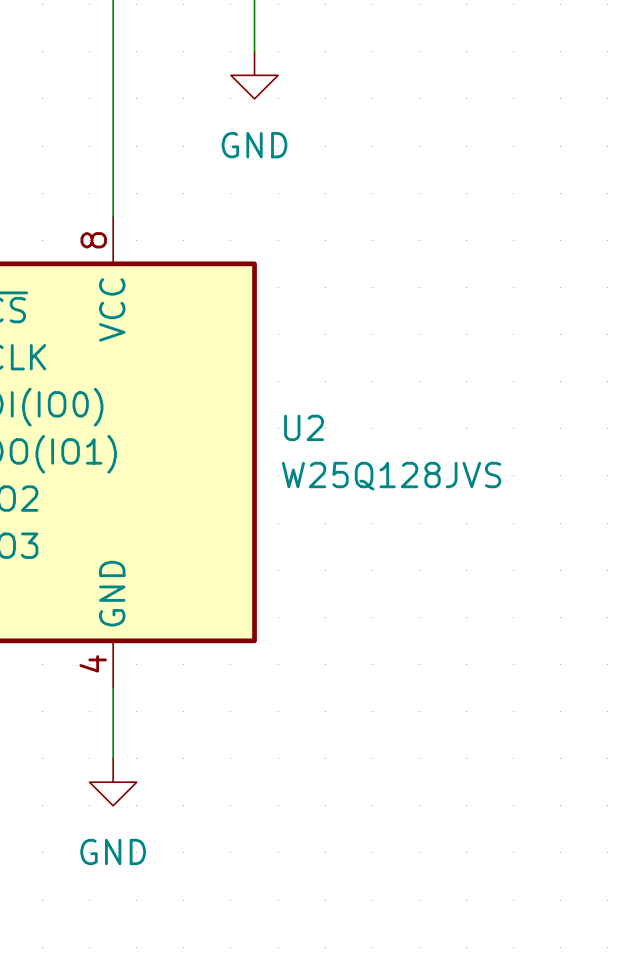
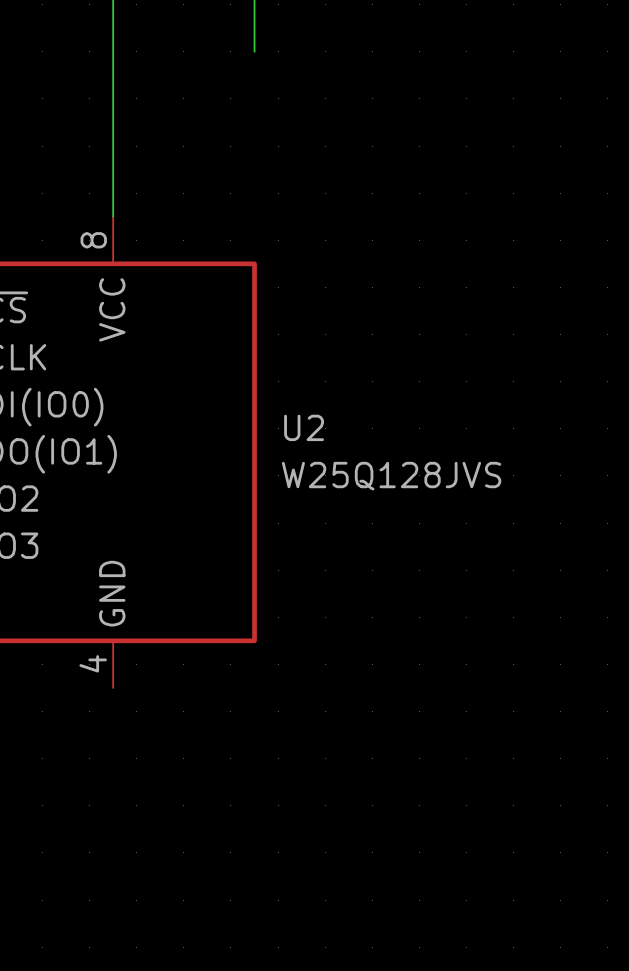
power symbol: GND (254, 75) -> none
wire: (113, 687) (113, 758) -> none
power symbol: GND (113, 782) -> none

